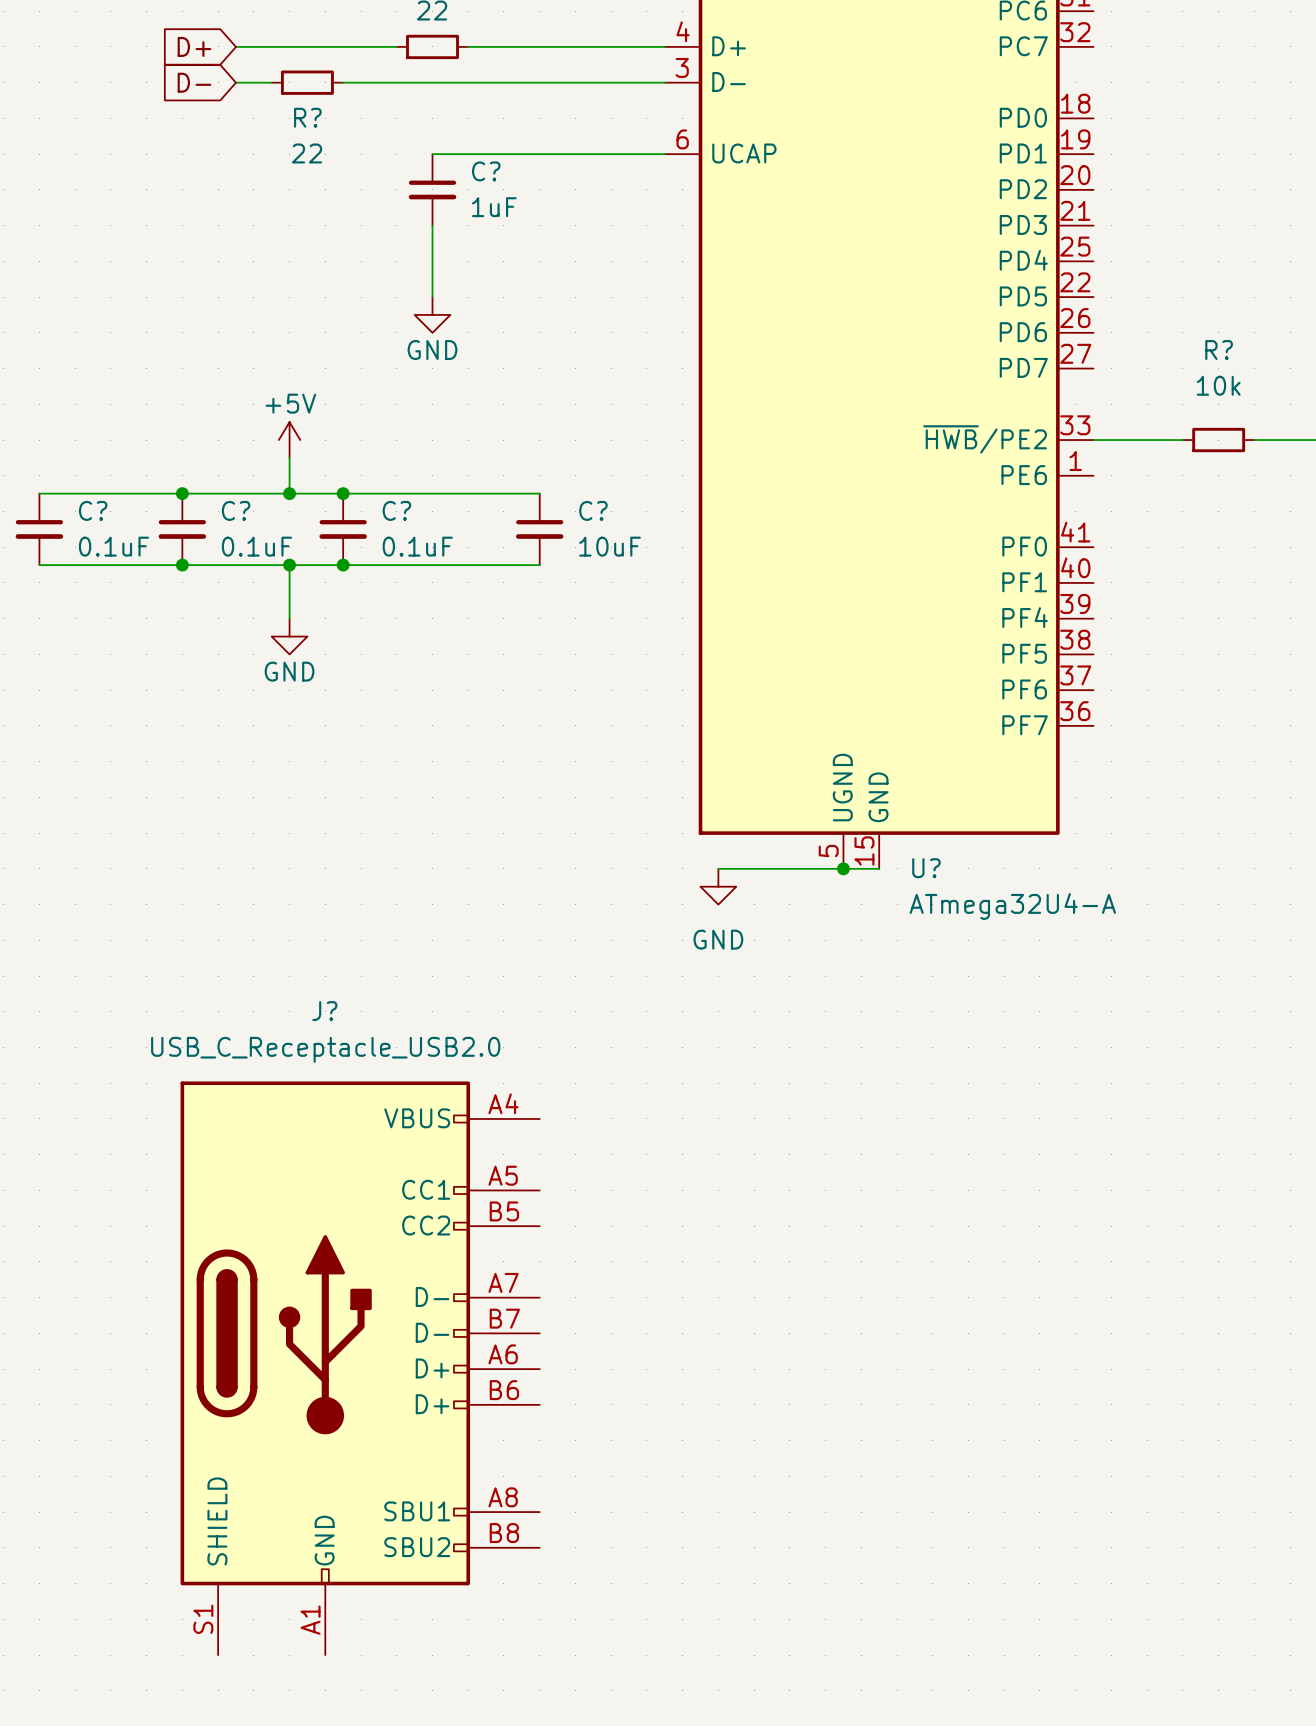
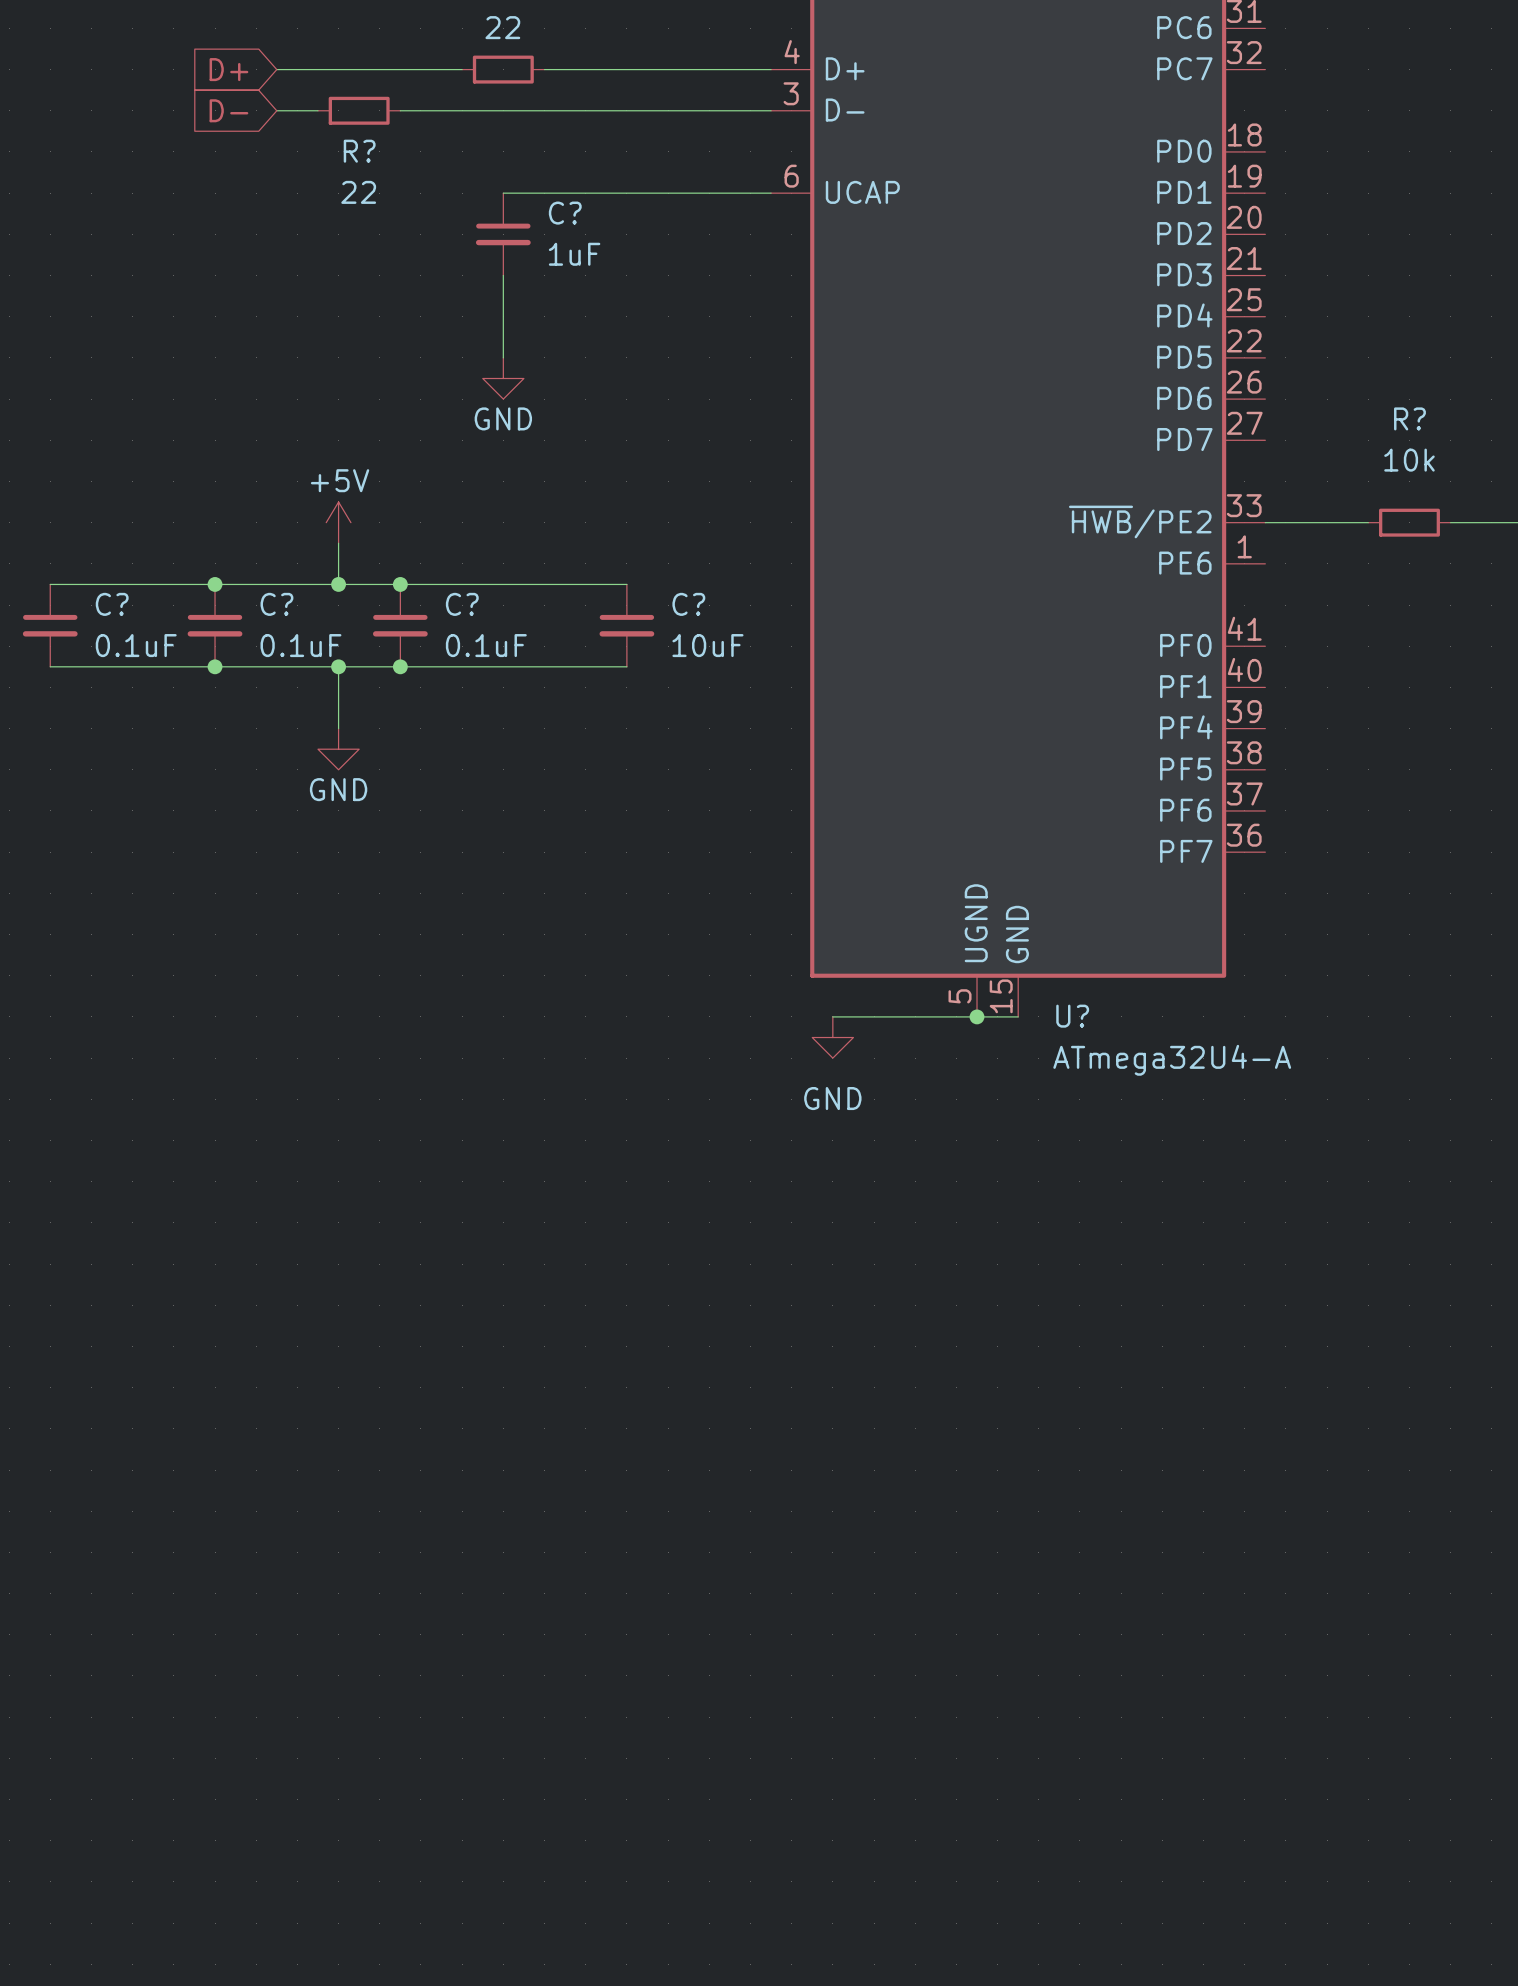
J?: USB_C_Receptacle_USB2.0 (360, 1368) -> none

